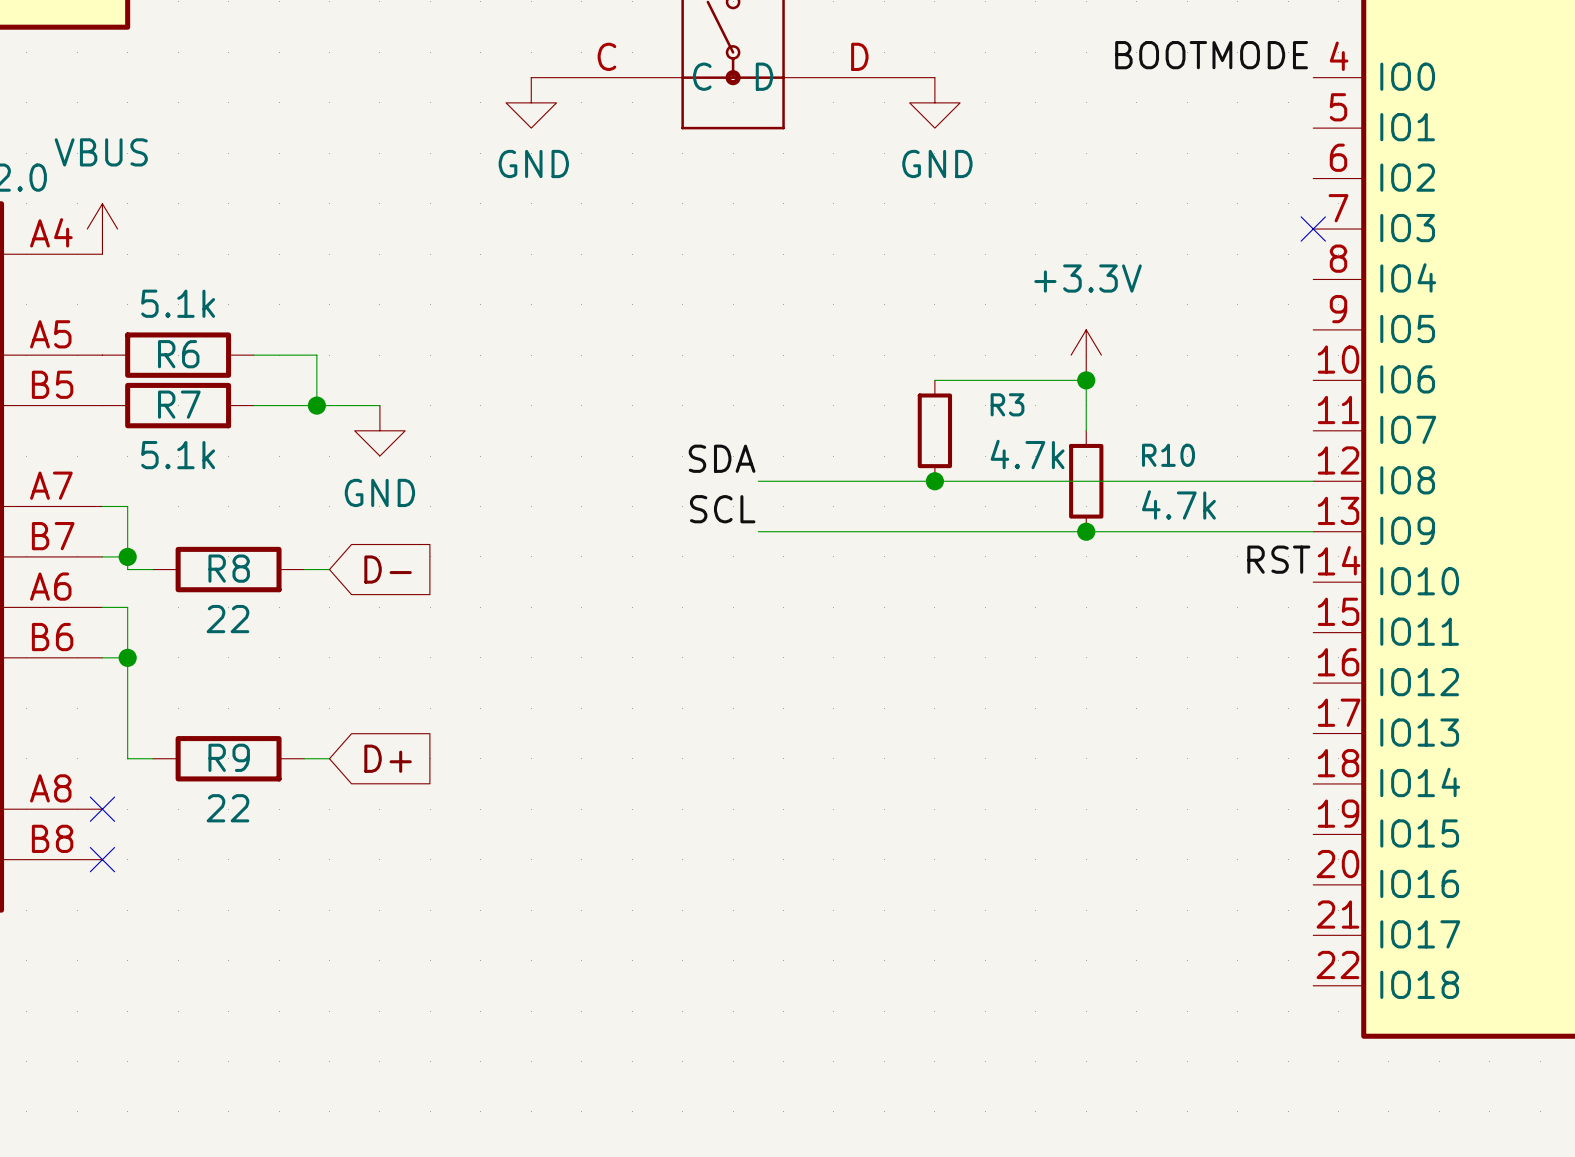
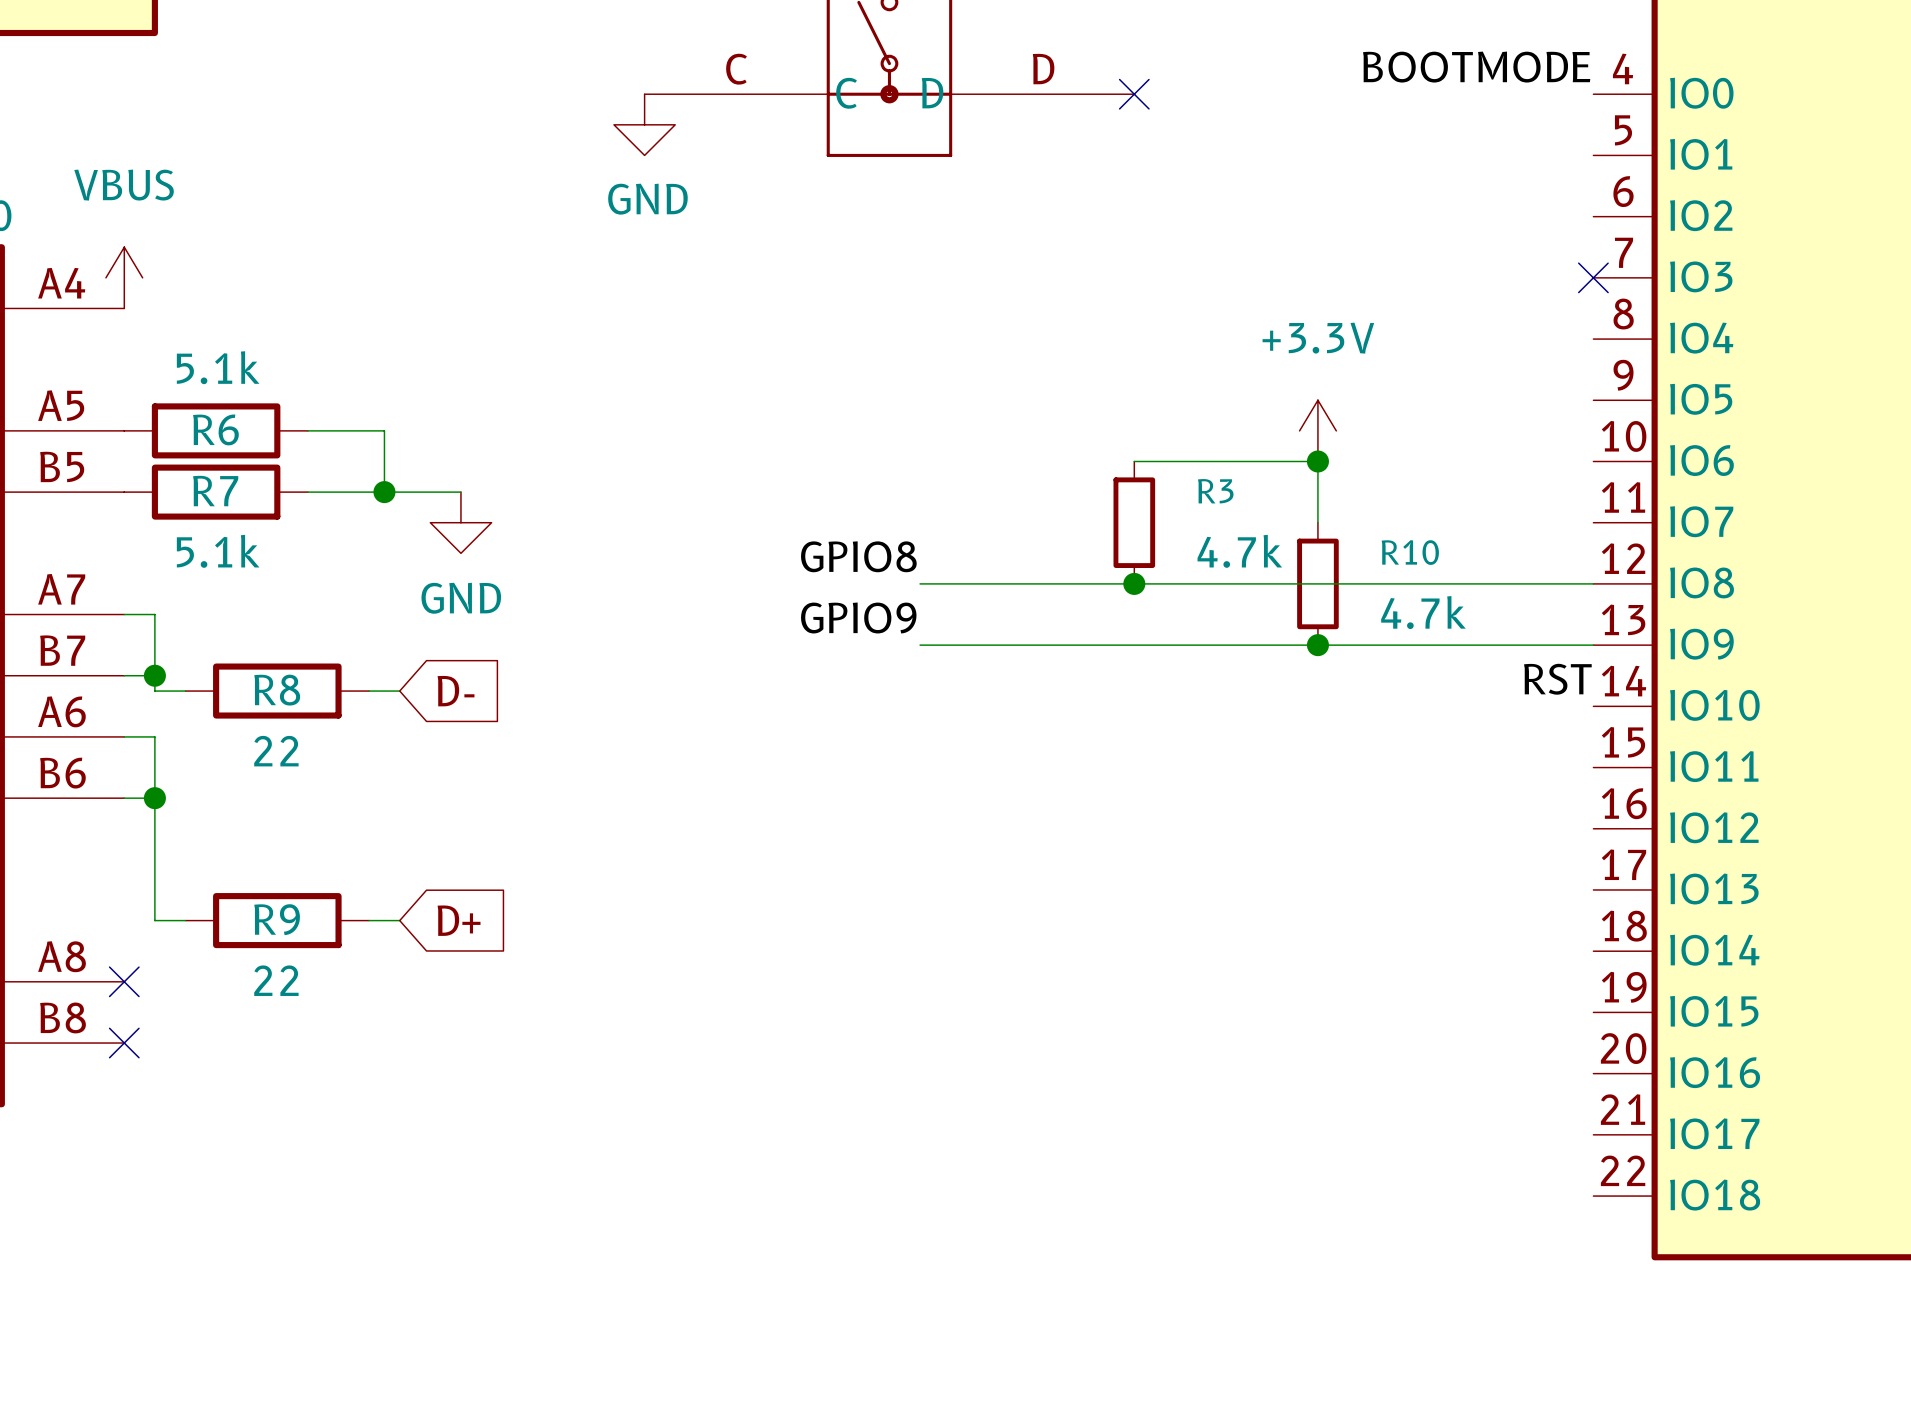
no-connect mark: none -> (1134, 94)
power symbol: GND (934, 102) -> none
label: SDA (722, 458) -> GPIO8 (858, 556)
label: SCL (722, 509) -> GPIO9 (858, 617)

